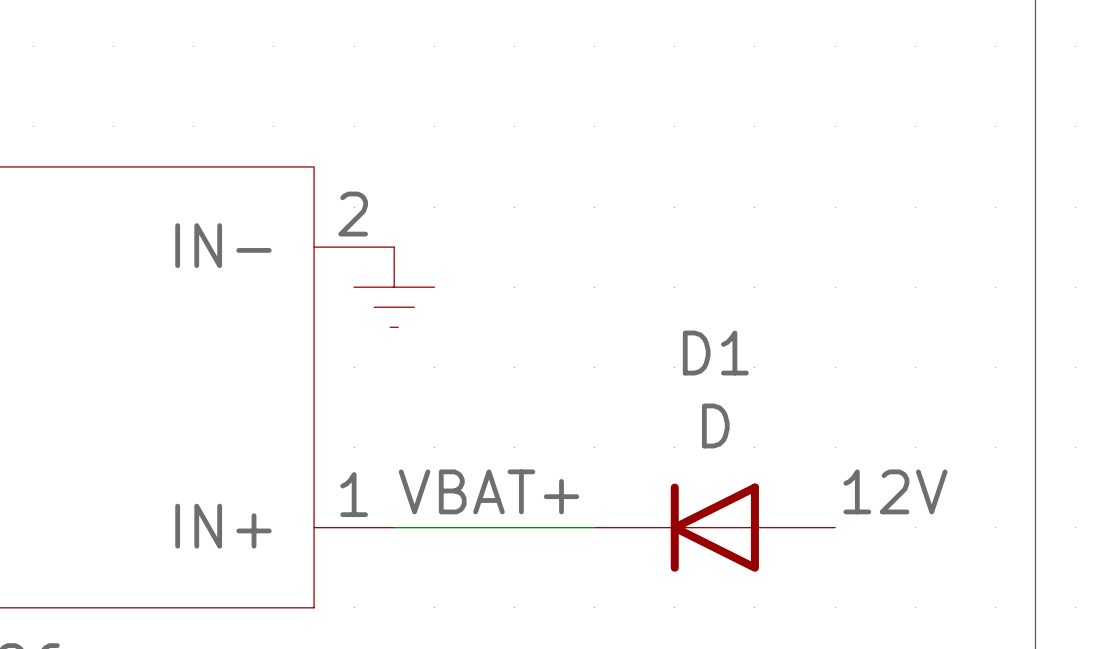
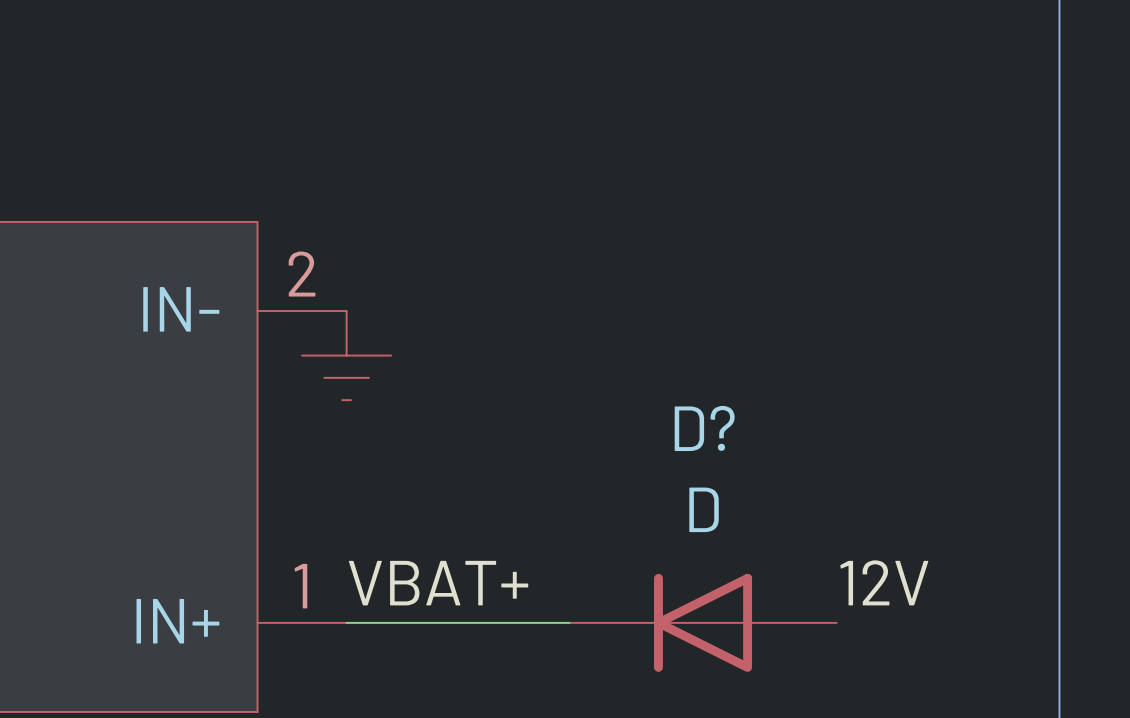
D1 name: D1 (715, 353) -> D? (704, 428)

